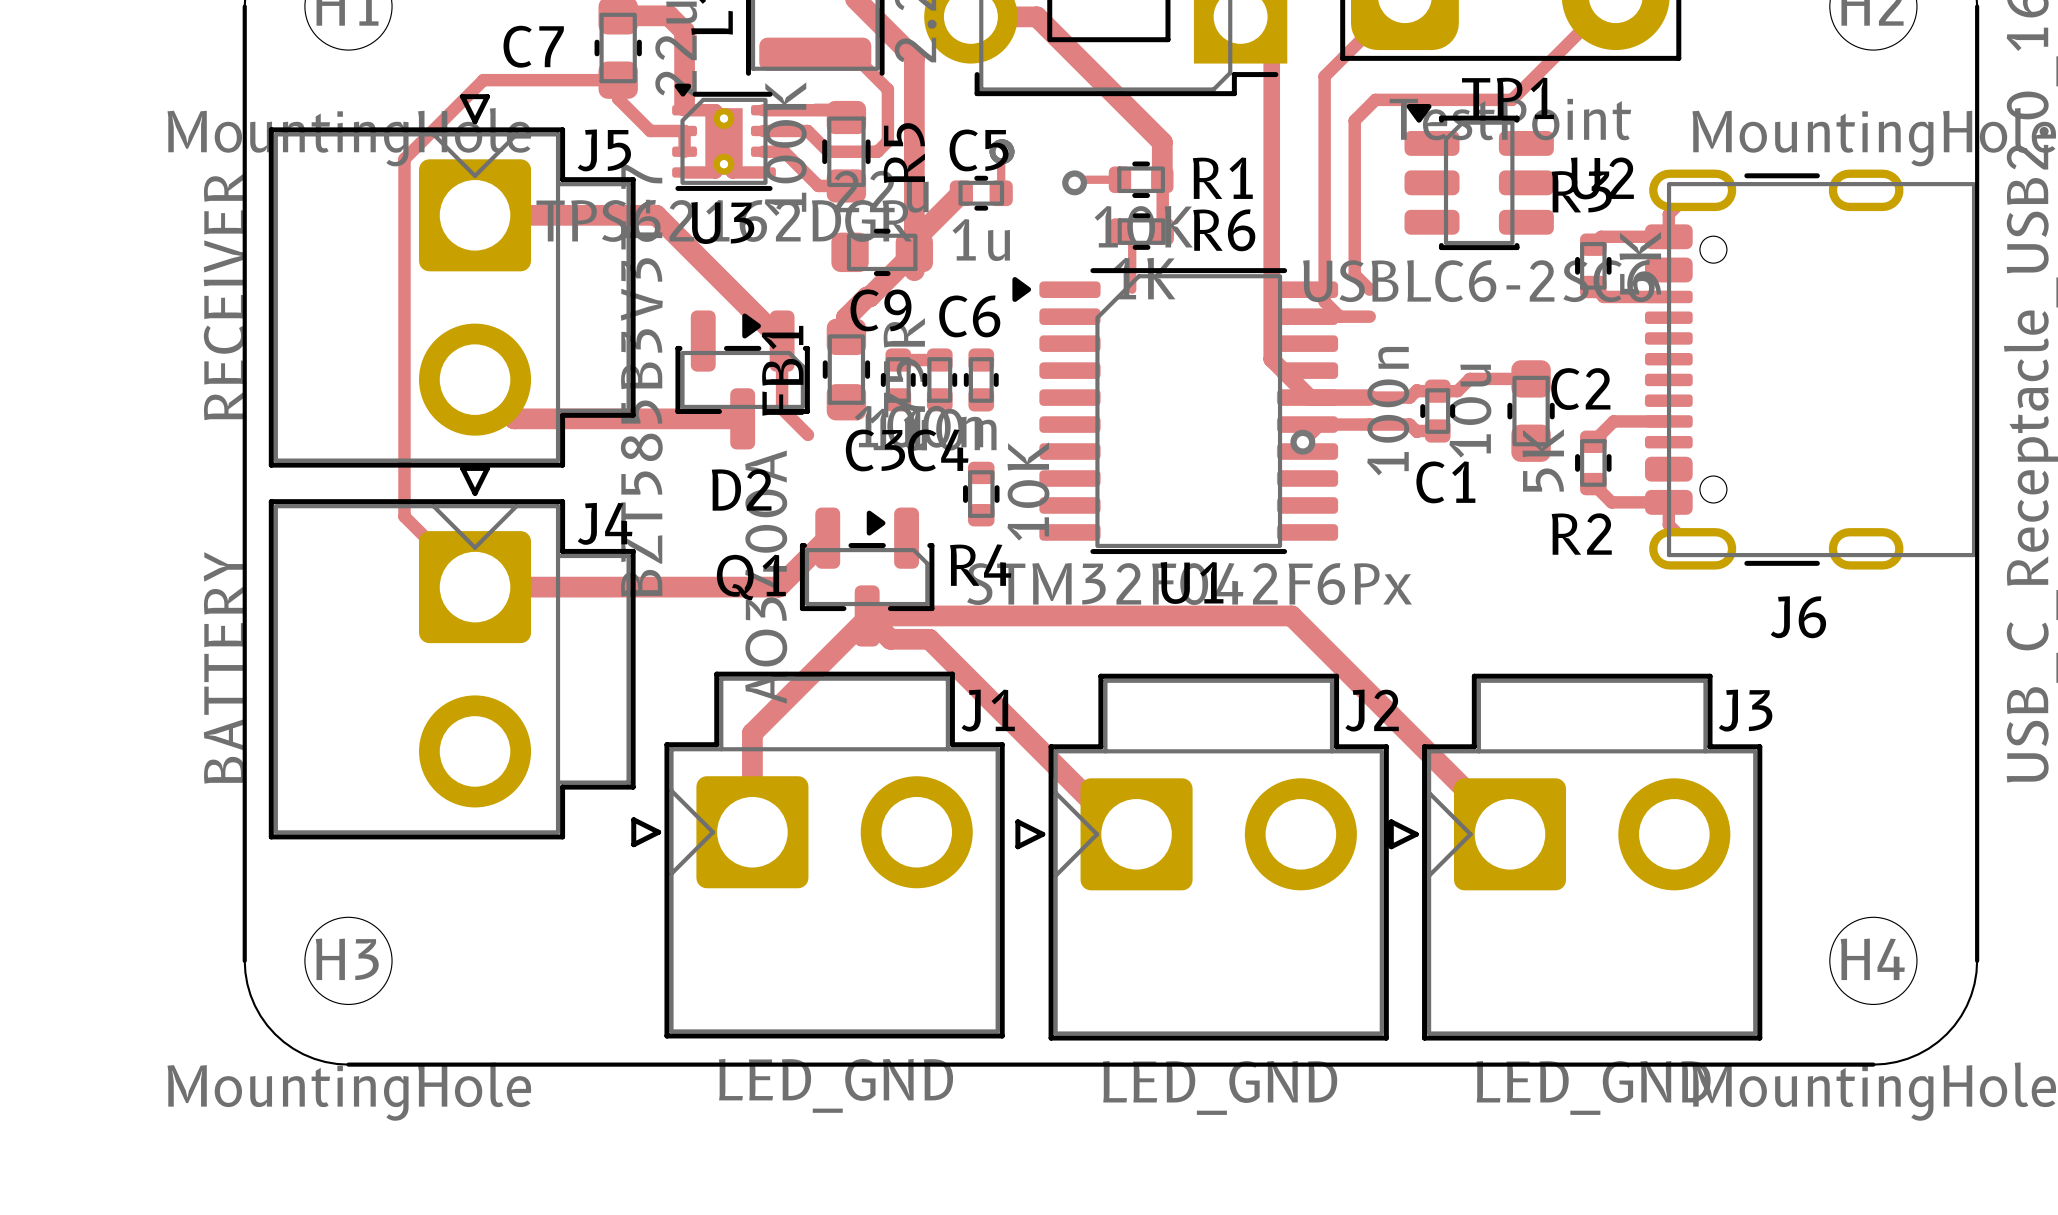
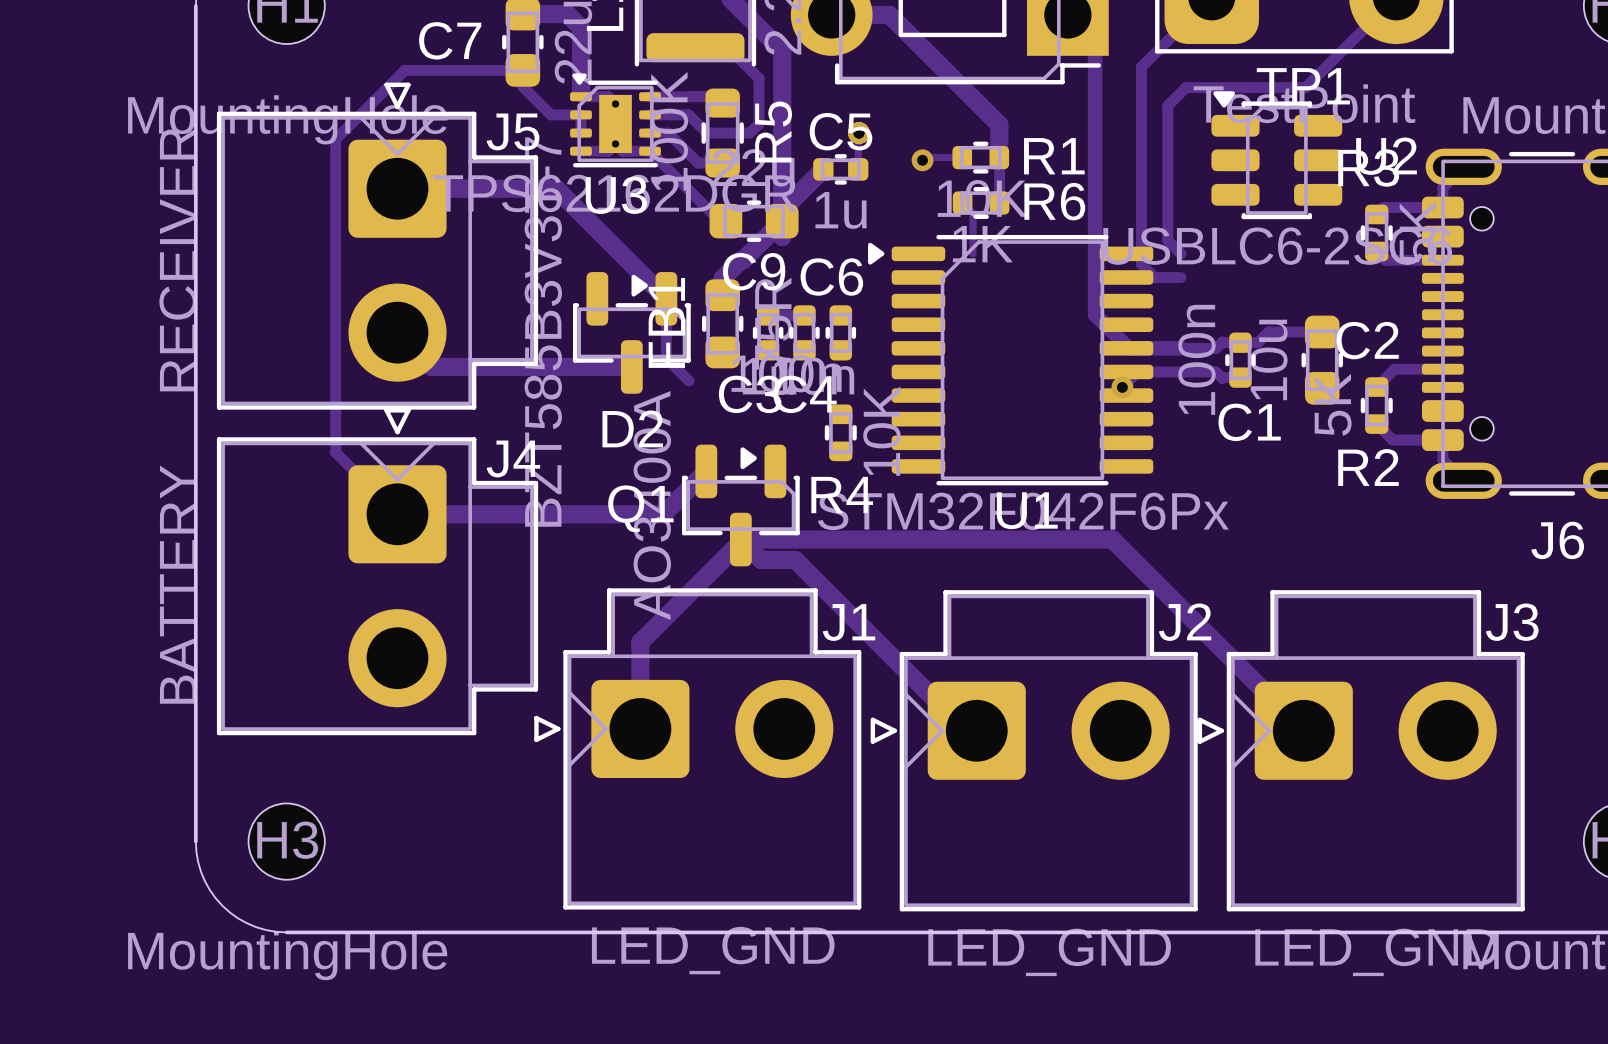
track: none -> (650, 151) (719, 221)

